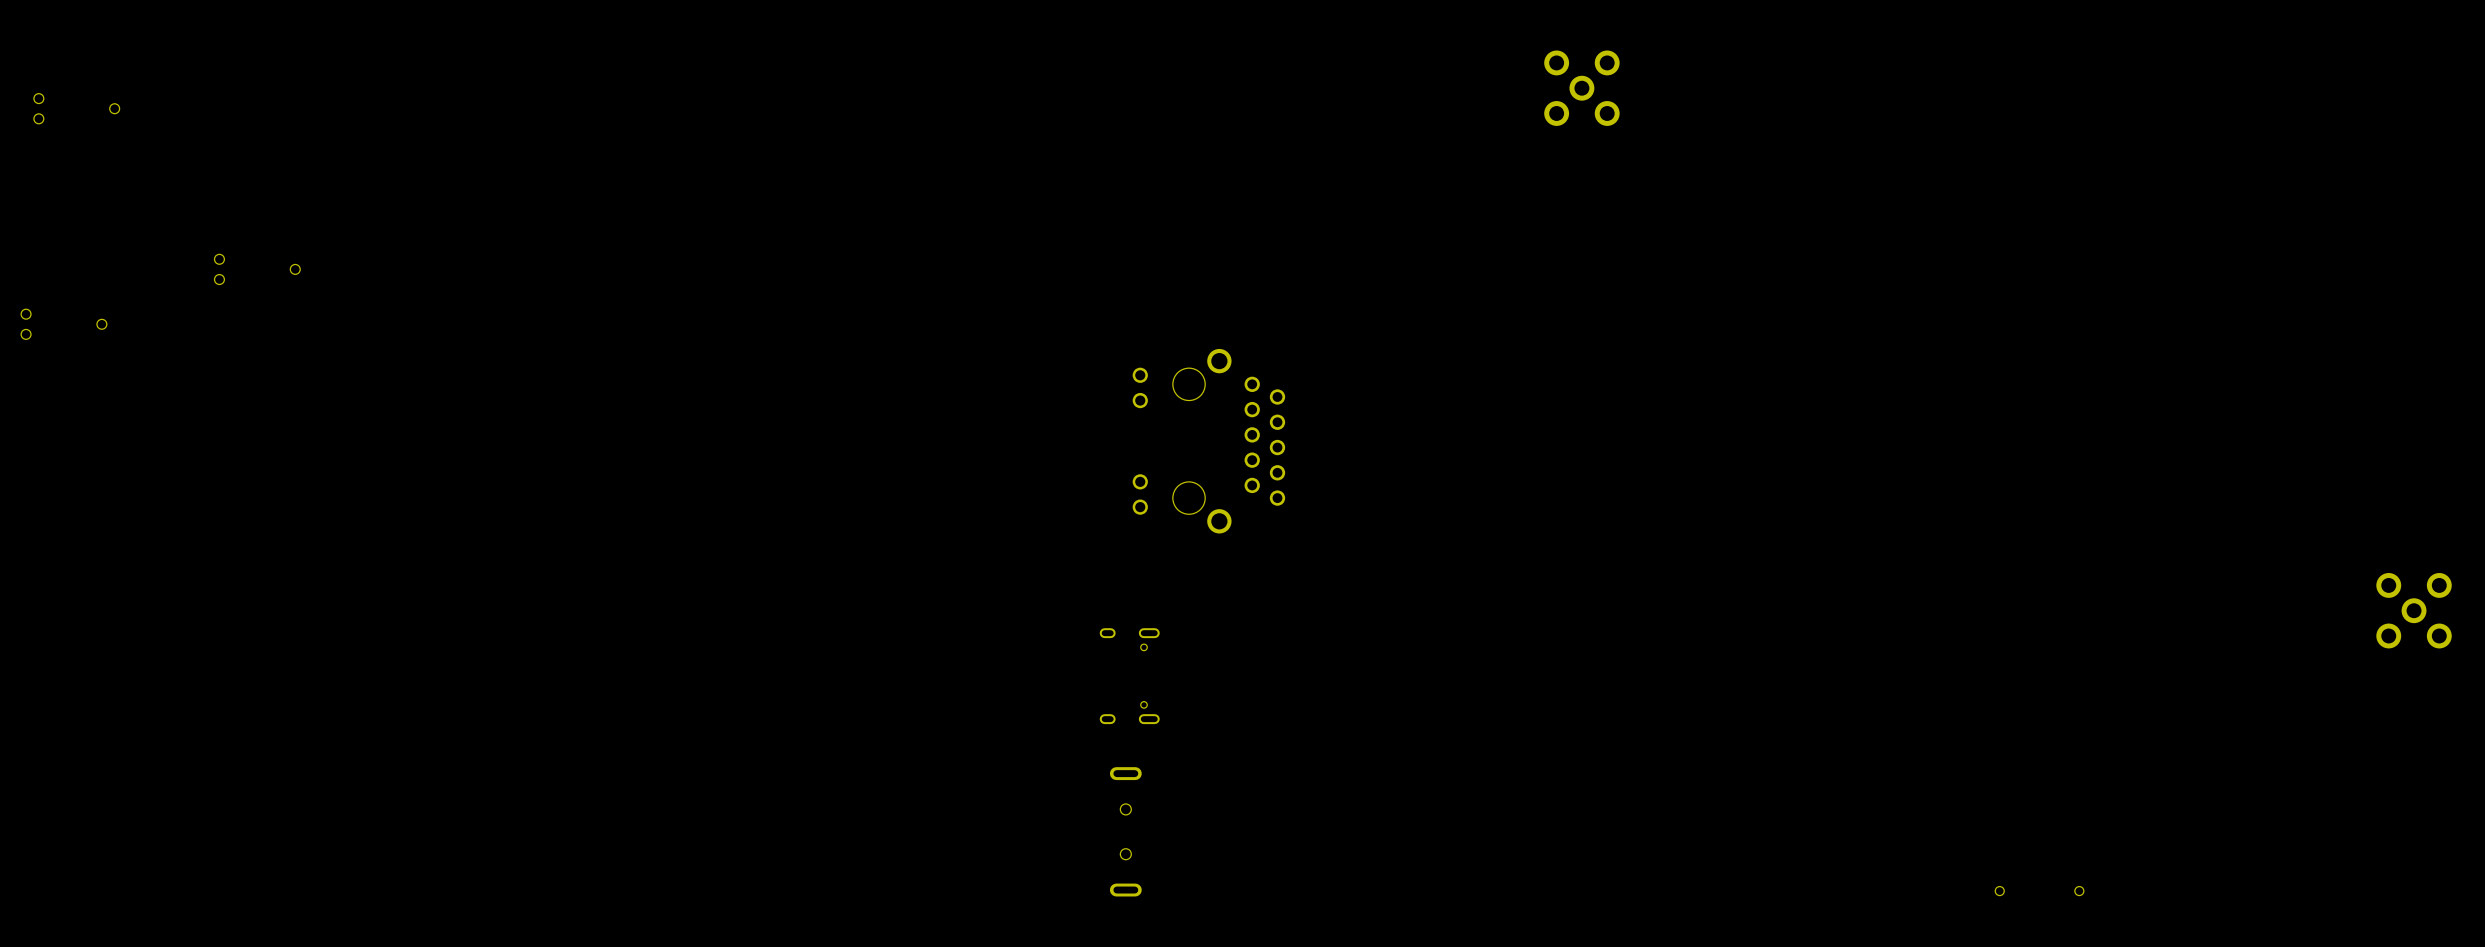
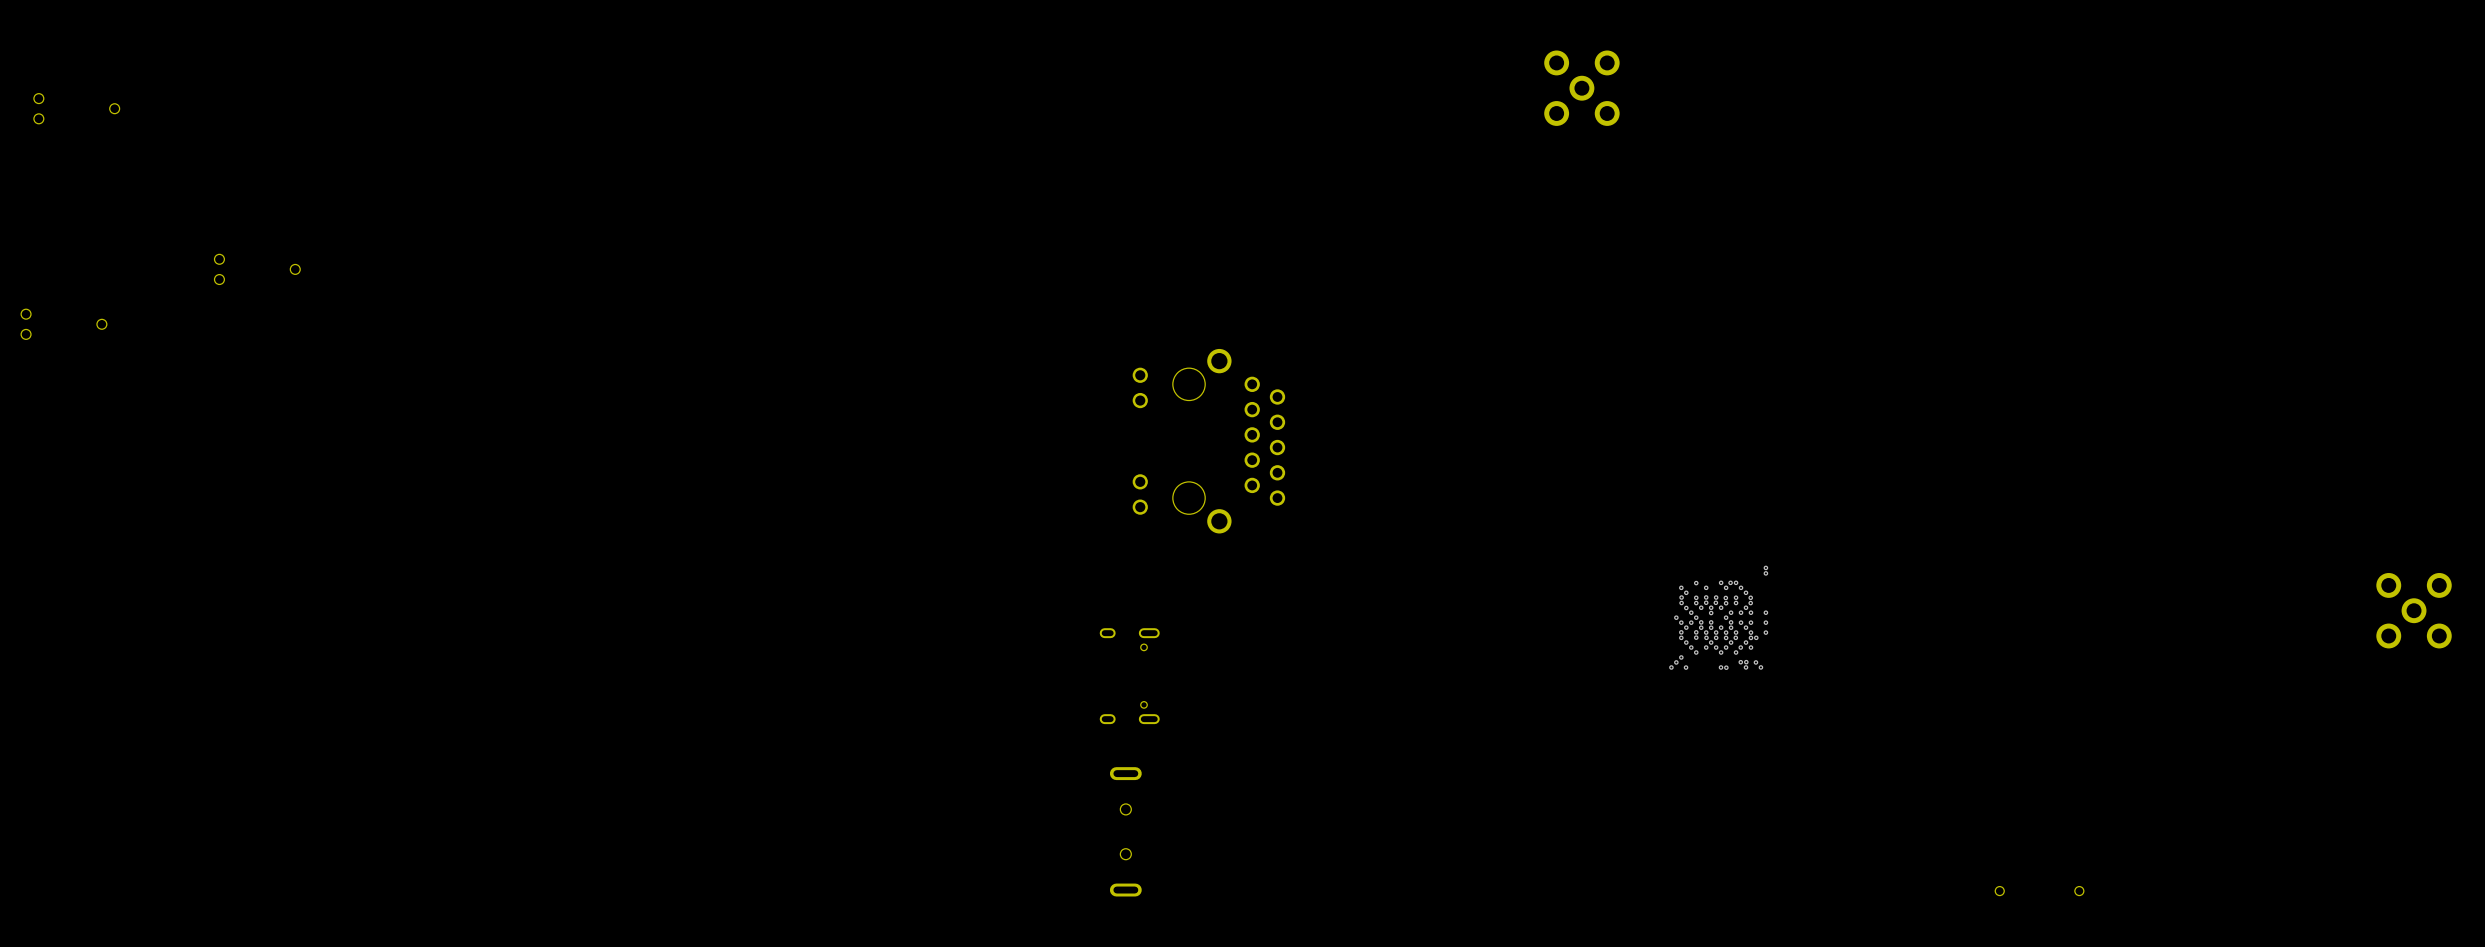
via: none -> (1765, 567)
via: none -> (1765, 573)
via: none -> (1721, 582)
via: none -> (1730, 582)
via: none -> (1736, 582)
via: none -> (1696, 583)
via: none -> (1681, 587)
via: none -> (1706, 587)
via: none -> (1726, 587)
via: none -> (1741, 587)
via: none -> (1686, 592)
via: none -> (1746, 592)
via: none -> (1681, 597)
via: none -> (1696, 597)
via: none -> (1706, 597)
via: none -> (1716, 597)
via: none -> (1725, 597)
via: none -> (1736, 597)
via: none -> (1750, 597)
via: none -> (1706, 602)
via: none -> (1715, 602)
via: none -> (1681, 603)
via: none -> (1696, 603)
via: none -> (1726, 603)
via: none -> (1736, 603)
via: none -> (1750, 603)
via: none -> (1686, 607)
via: none -> (1701, 607)
via: none -> (1711, 607)
via: none -> (1721, 607)
via: none -> (1746, 607)
via: none -> (1691, 612)
via: none -> (1731, 612)
via: none -> (1741, 612)
via: none -> (1750, 612)
via: none -> (1765, 612)
via: none -> (1711, 613)
via: none -> (1676, 617)
via: none -> (1696, 617)
via: none -> (1726, 617)
via: none -> (1681, 622)
via: none -> (1691, 622)
via: none -> (1701, 622)
via: none -> (1711, 622)
via: none -> (1731, 622)
via: none -> (1741, 622)
via: none -> (1750, 622)
via: none -> (1765, 622)
via: none -> (1686, 627)
via: none -> (1701, 627)
via: none -> (1711, 627)
via: none -> (1721, 627)
via: none -> (1731, 627)
via: none -> (1746, 627)
via: none -> (1681, 632)
via: none -> (1696, 632)
via: none -> (1706, 632)
via: none -> (1716, 632)
via: none -> (1726, 632)
via: none -> (1736, 632)
via: none -> (1750, 632)
via: none -> (1765, 632)
via: none -> (1681, 637)
via: none -> (1696, 637)
via: none -> (1706, 637)
via: none -> (1716, 637)
via: none -> (1726, 637)
via: none -> (1735, 637)
via: none -> (1750, 637)
via: none -> (1756, 637)
via: none -> (1686, 642)
via: none -> (1711, 642)
via: none -> (1731, 642)
via: none -> (1746, 642)
via: none -> (1691, 647)
via: none -> (1706, 647)
via: none -> (1716, 647)
via: none -> (1726, 647)
via: none -> (1740, 647)
via: none -> (1750, 647)
via: none -> (1696, 652)
via: none -> (1721, 652)
via: none -> (1736, 652)
via: none -> (1681, 657)
via: none -> (1676, 662)
via: none -> (1740, 662)
via: none -> (1746, 662)
via: none -> (1755, 662)
via: none -> (1671, 667)
via: none -> (1686, 667)
via: none -> (1721, 667)
via: none -> (1726, 667)
via: none -> (1746, 667)
via: none -> (1760, 667)

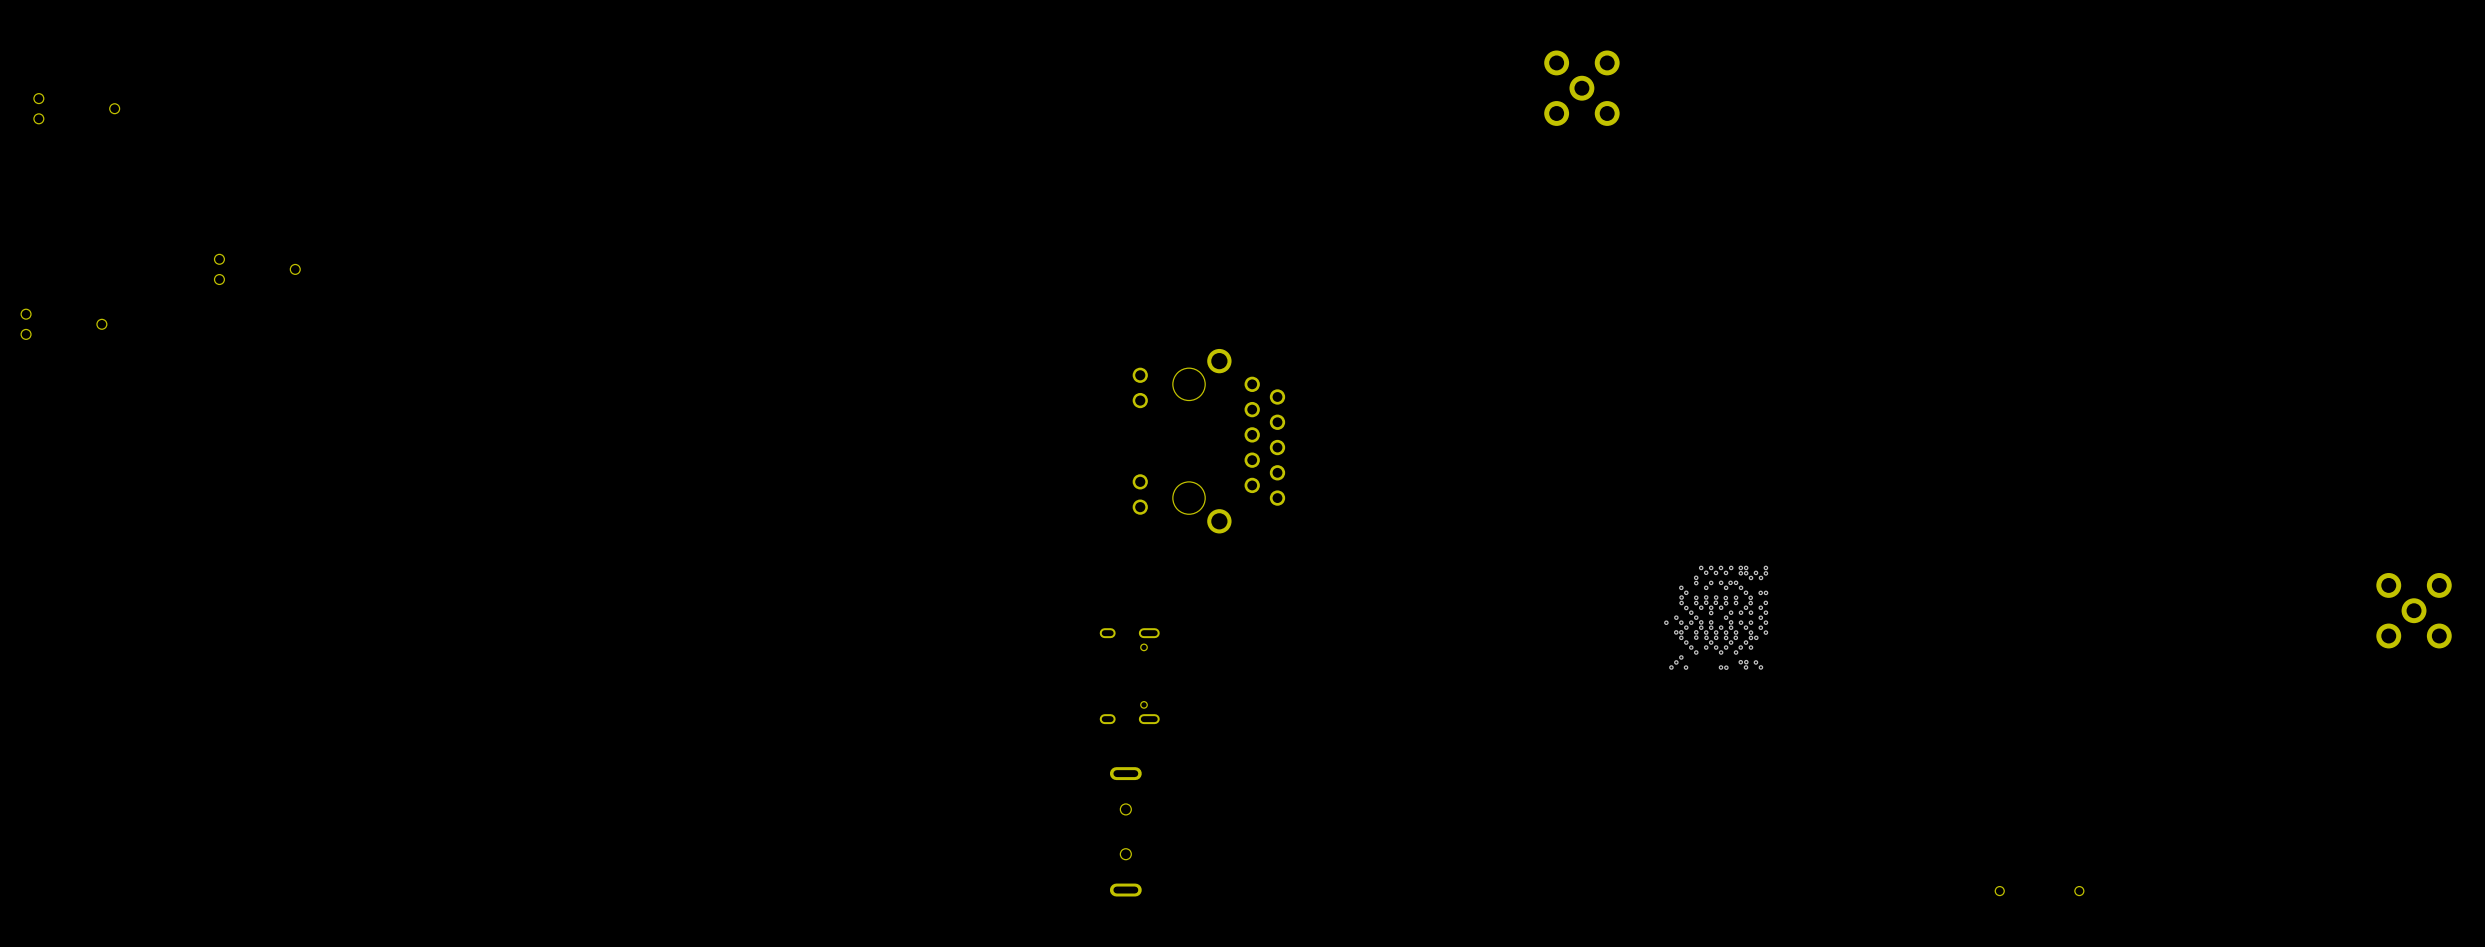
via: none -> (1701, 567)
via: none -> (1711, 567)
via: none -> (1721, 567)
via: none -> (1731, 567)
via: none -> (1740, 567)
via: none -> (1746, 567)
via: none -> (1706, 572)
via: none -> (1716, 572)
via: none -> (1726, 572)
via: none -> (1756, 572)
via: none -> (1740, 573)
via: none -> (1746, 573)
via: none -> (1696, 577)
via: none -> (1751, 577)
via: none -> (1761, 577)
via: none -> (1711, 582)
via: none -> (1760, 592)
via: none -> (1765, 592)
via: none -> (1765, 602)
via: none -> (1760, 607)
via: none -> (1760, 617)
via: none -> (1666, 622)
via: none -> (1760, 627)
via: none -> (1676, 632)

